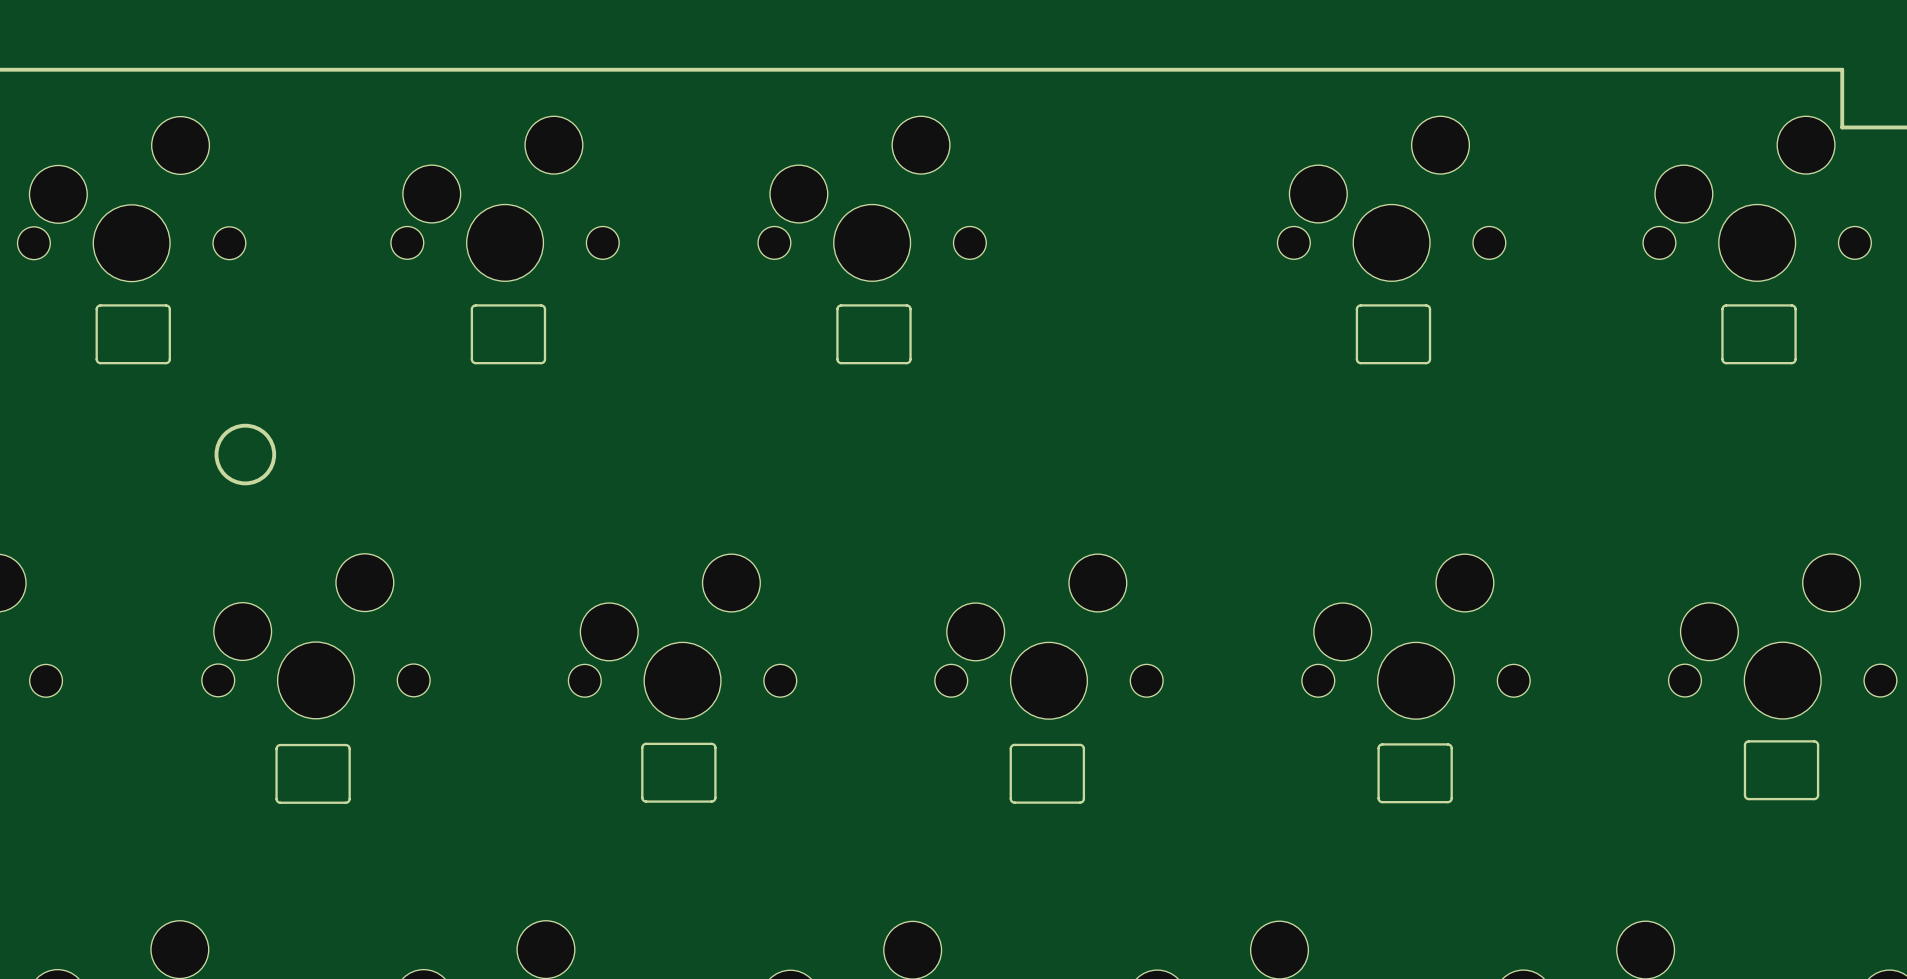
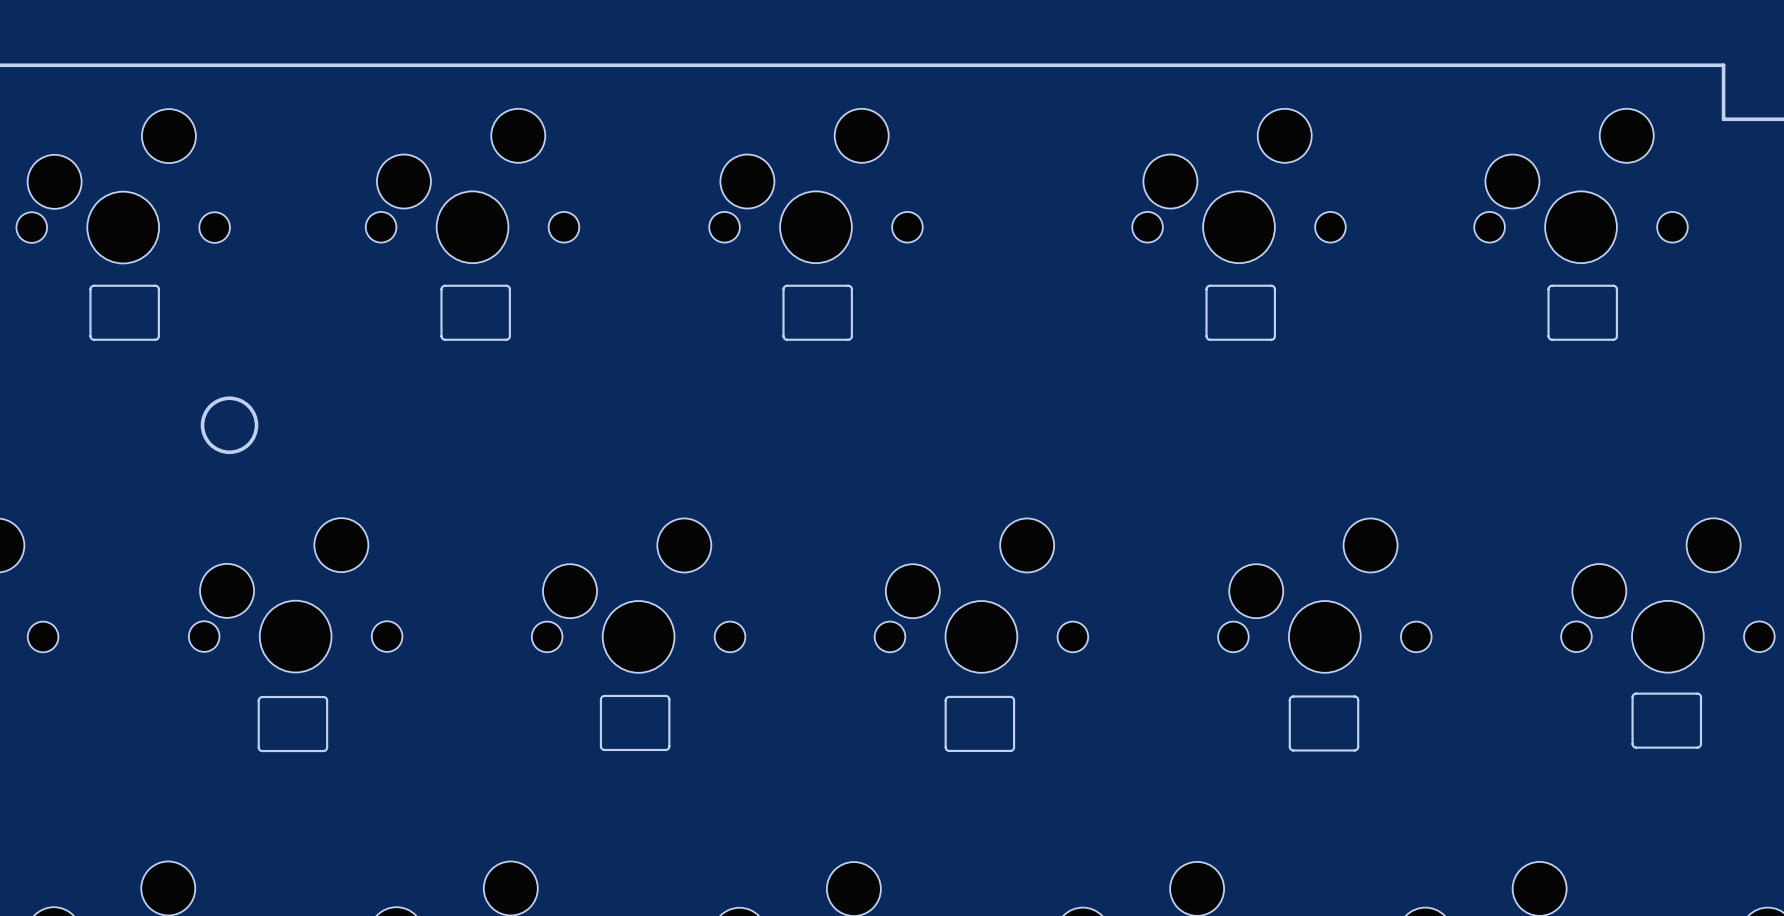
part position: (1391, 198) -> (1239, 185)
part position: (1757, 198) -> (1581, 185)
part position: (1393, 334) -> (1240, 312)
part position: (1759, 334) -> (1582, 312)

